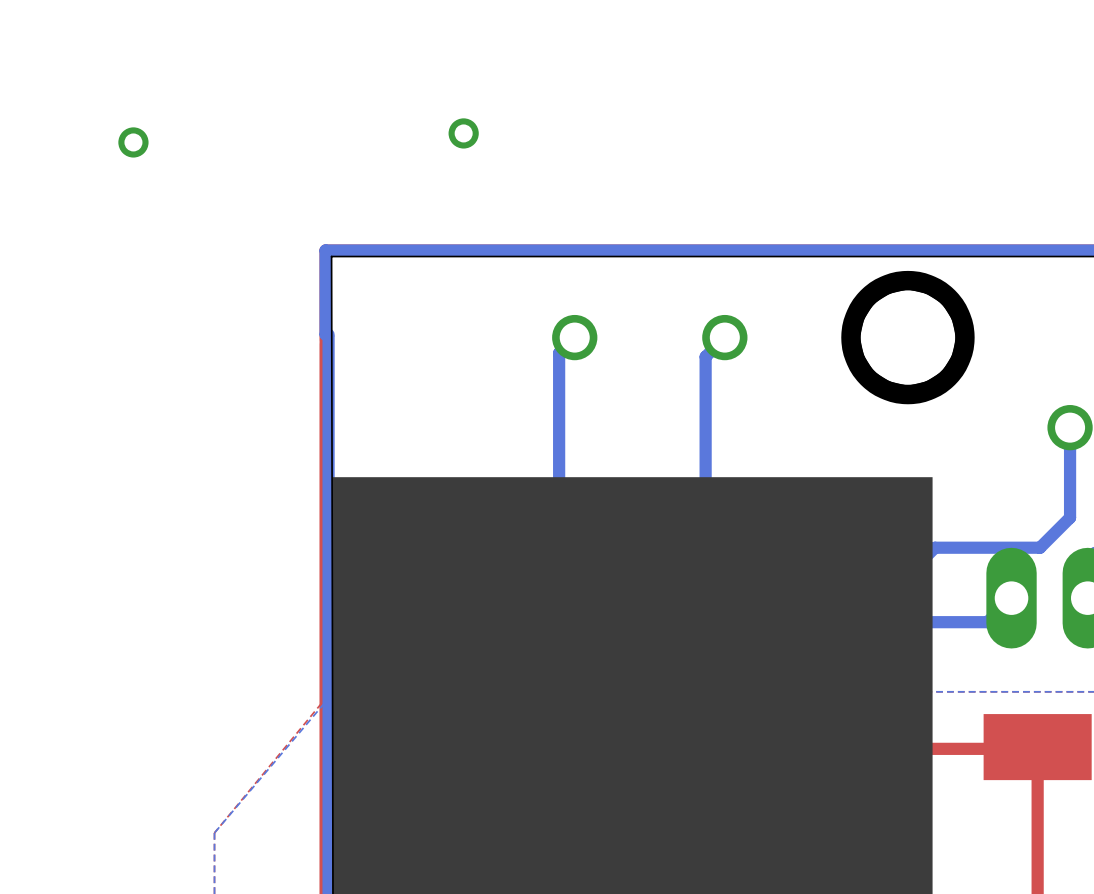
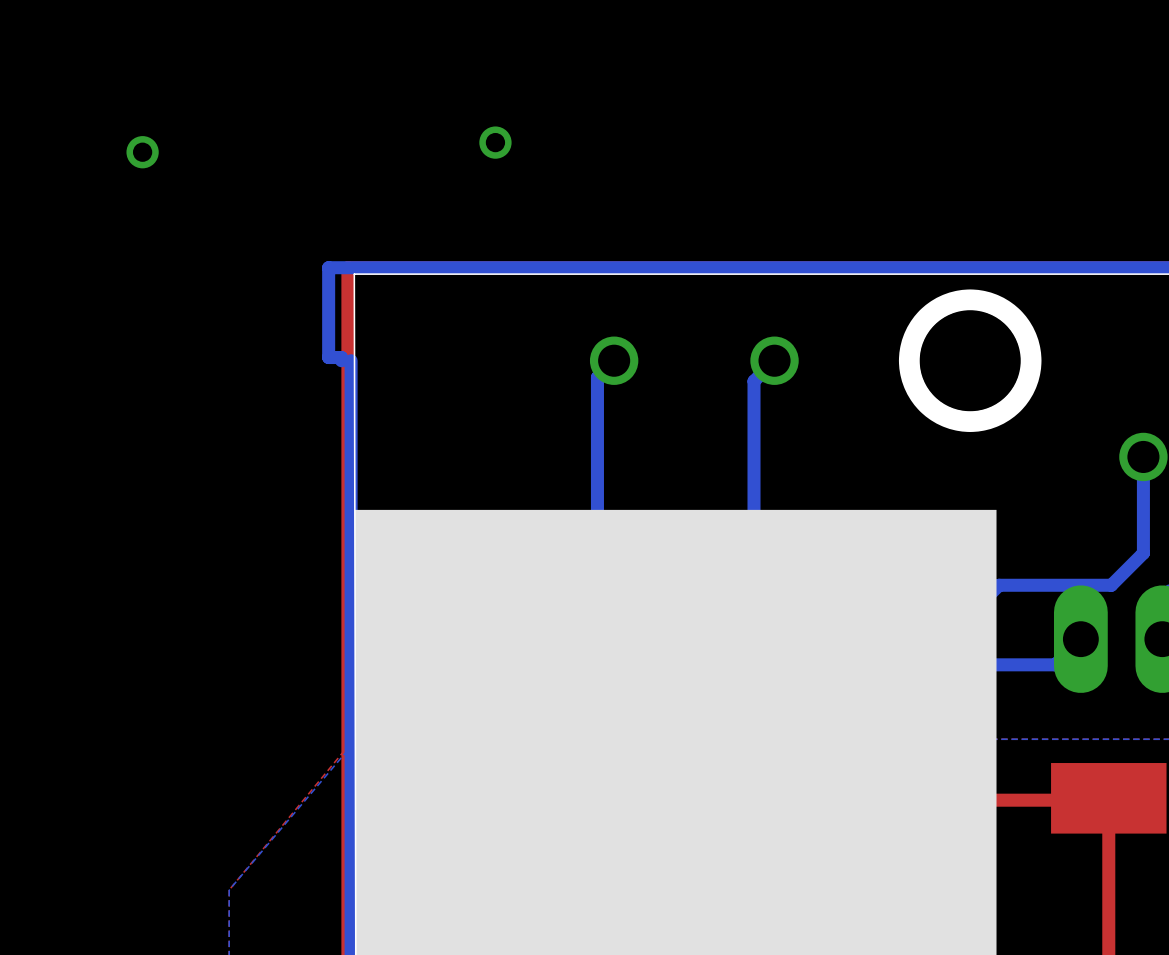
bottom track: (325, 250) (325, 334) (328, 334) -> (347, 267) (328, 267) (328, 357) (341, 357) (341, 360)

